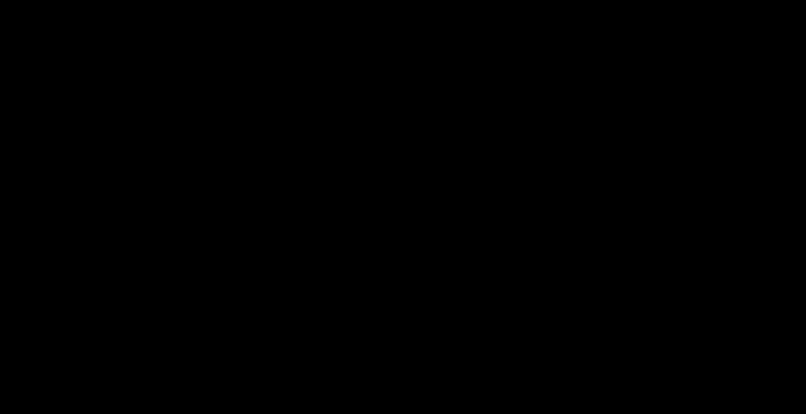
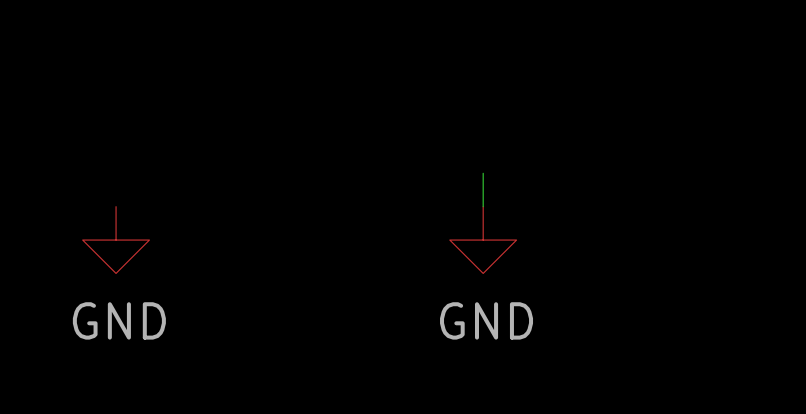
wire: none -> (483, 173) (483, 206)
power symbol: none -> GND (116, 240)
power symbol: none -> GND (483, 240)

